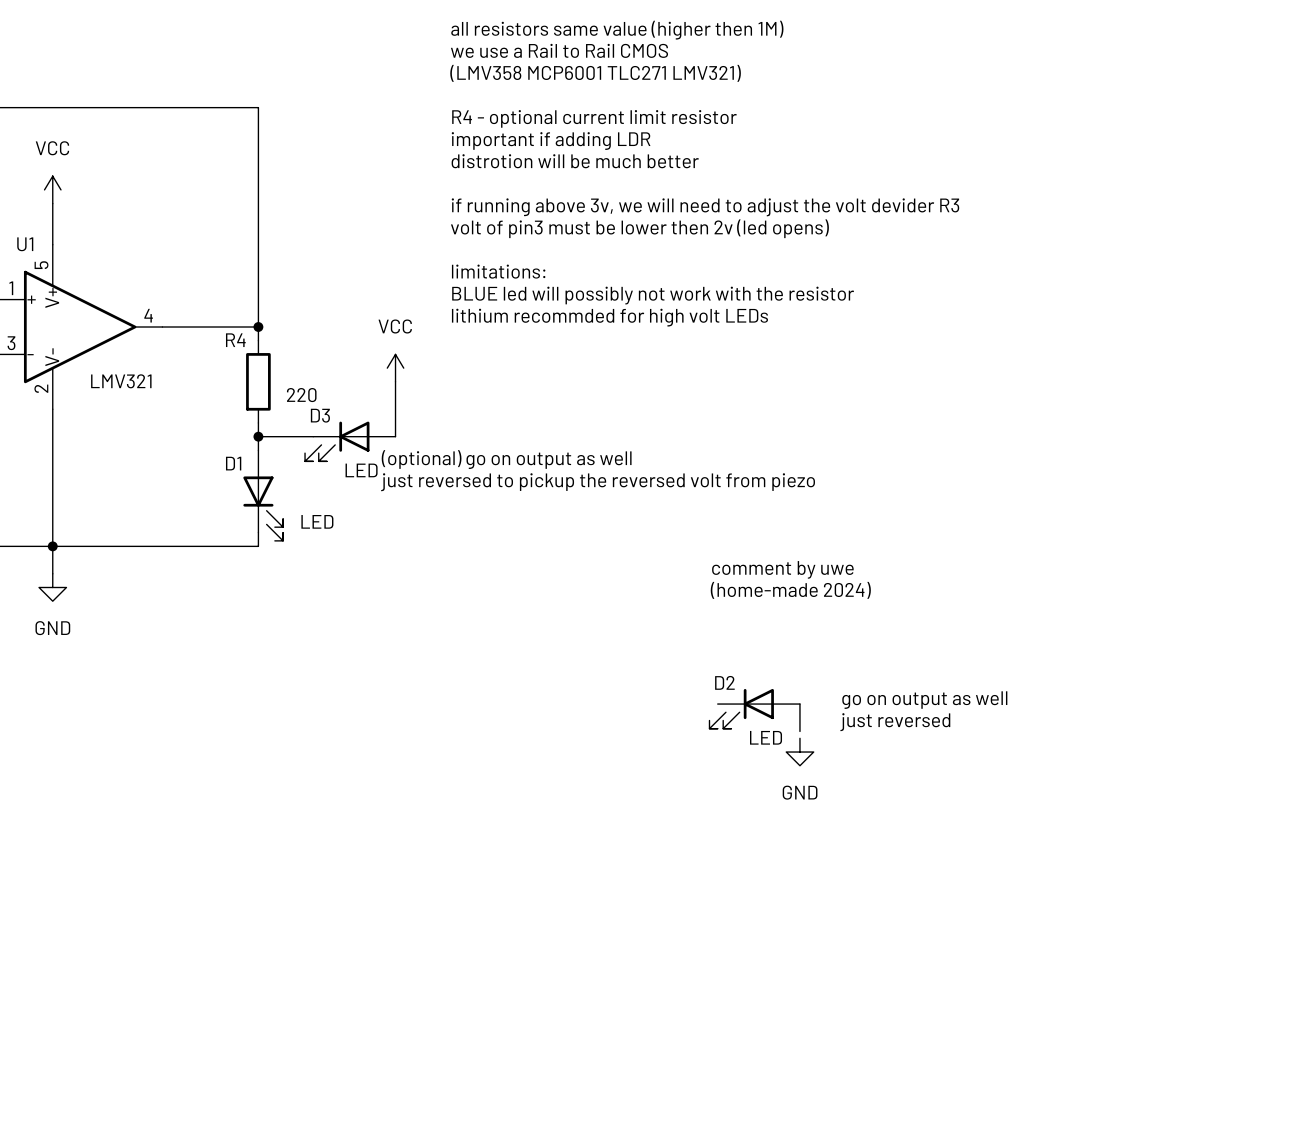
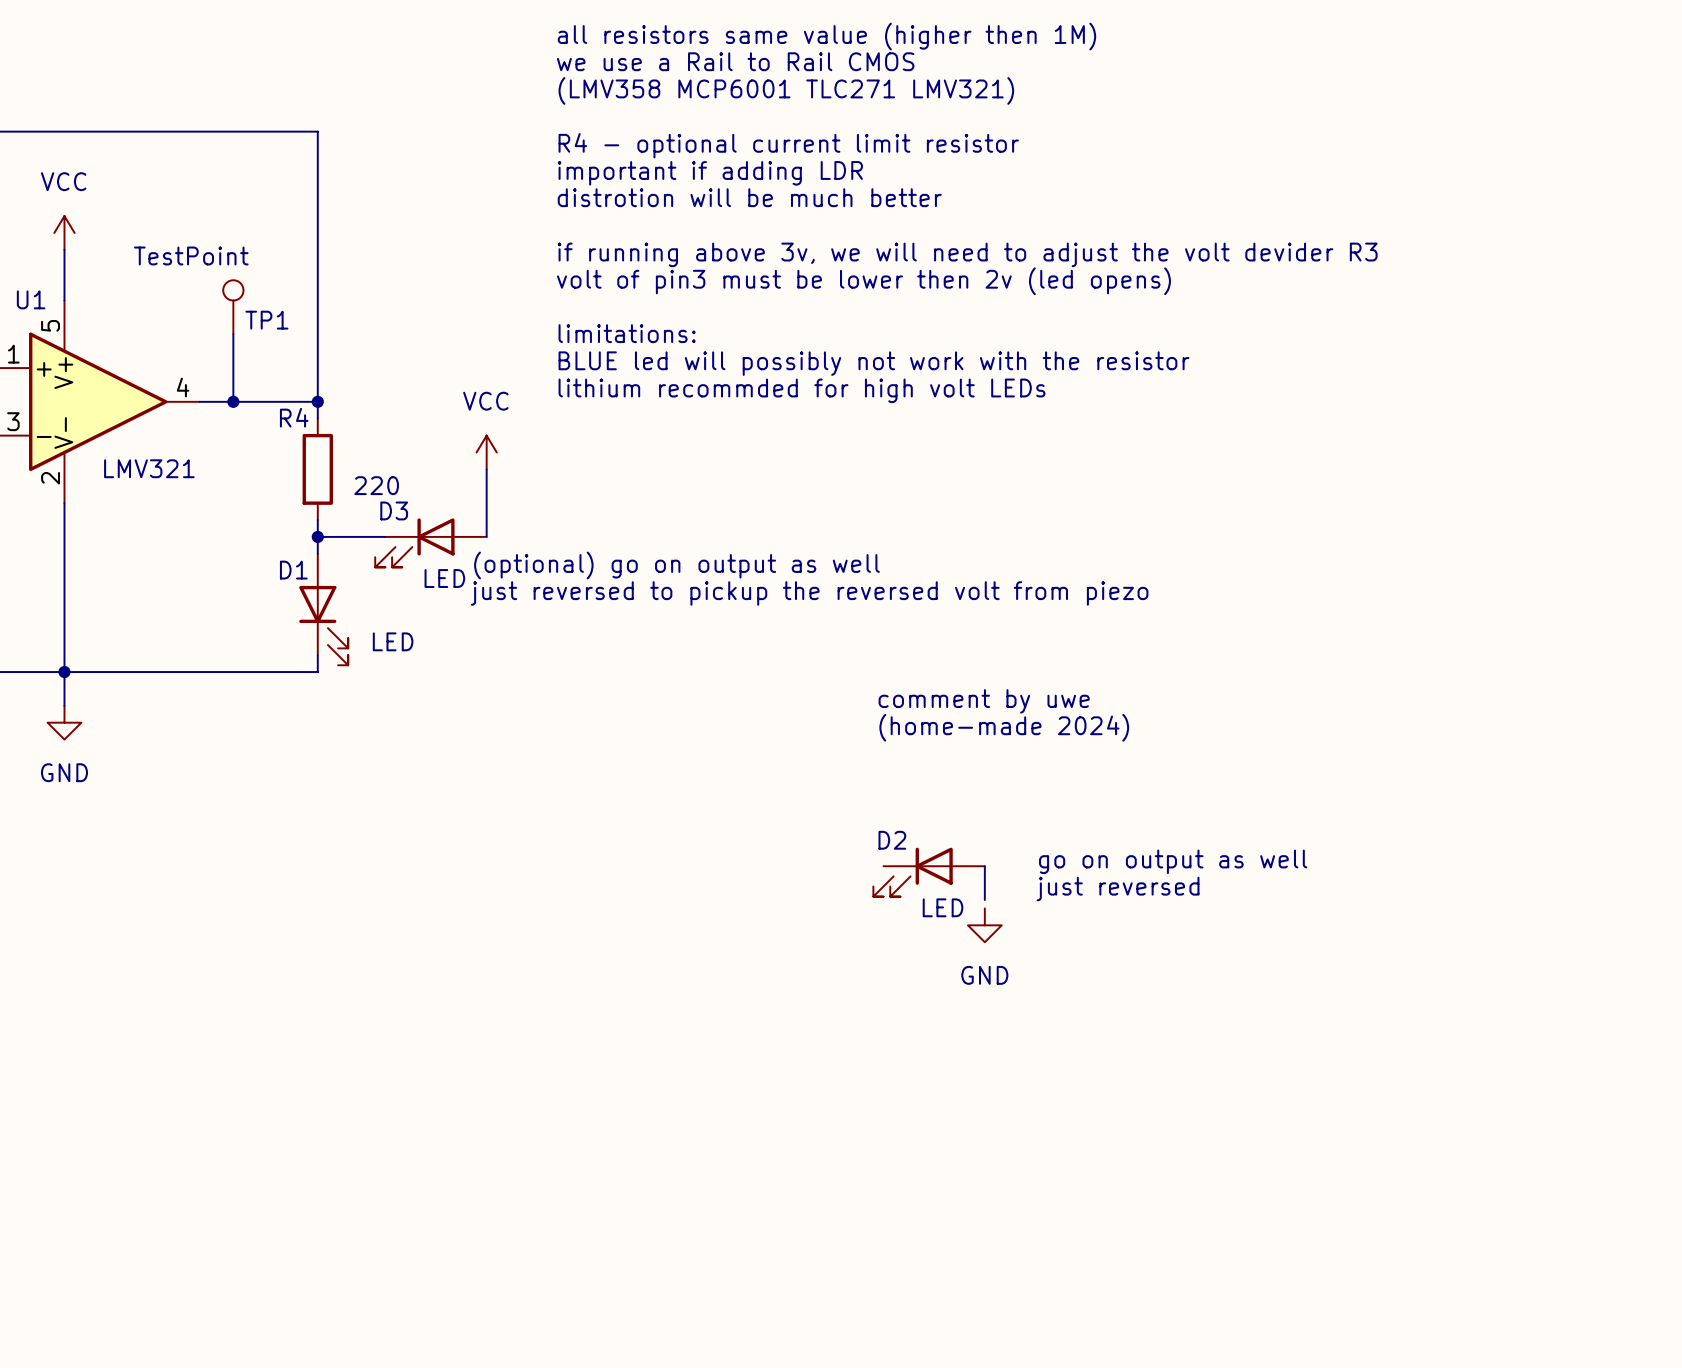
TP1: none -> TestPoint (233, 307)
wire: none -> (233, 334) (233, 401)
junction: none -> (233, 401)

